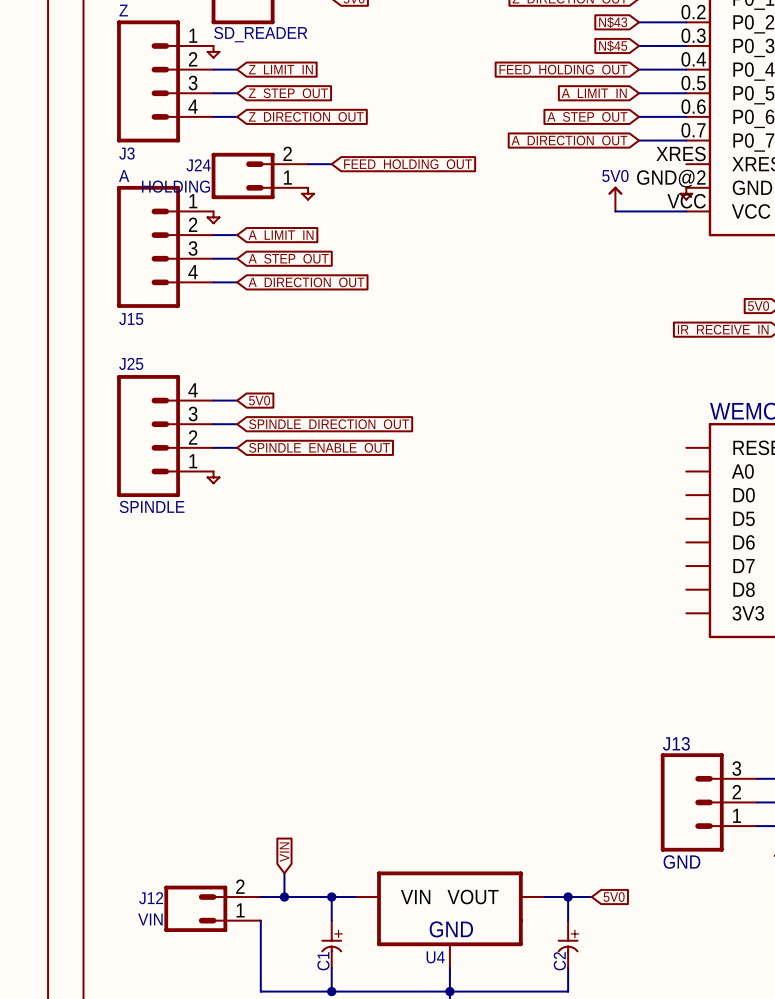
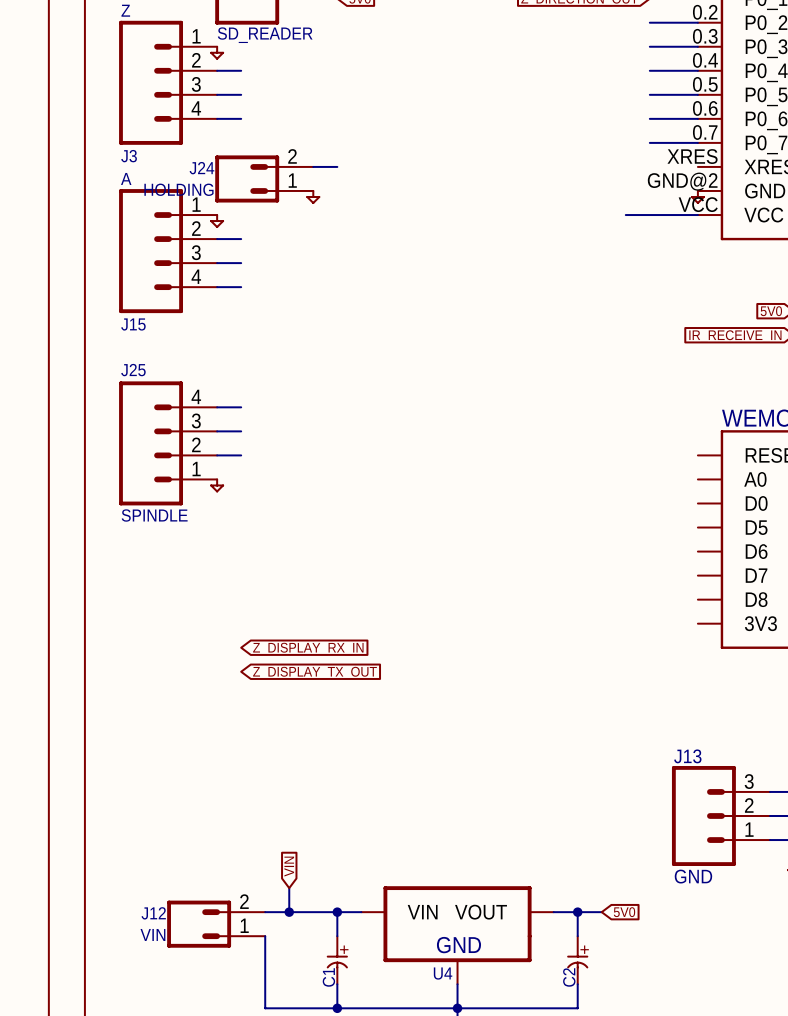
global label: N$43 (613, 22) -> none
global label: N$45 (613, 46) -> none
global label: Z_LIMIT_IN (280, 70) -> none
global label: FEED_HOLDING_OUT (563, 70) -> none
global label: Z_STEP_OUT (288, 94) -> none
global label: A_LIMIT_IN (594, 94) -> none
global label: Z_DIRECTION_OUT (306, 118) -> none
global label: A_STEP_OUT (587, 118) -> none
global label: A_DIRECTION_OUT (569, 141) -> none
global label: FEED_HOLDING_OUT (408, 165) -> none
power symbol: 5V0 (615, 199) -> none
global label: A_LIMIT_IN (281, 236) -> none
global label: A_STEP_OUT (288, 260) -> none
global label: A_DIRECTION_OUT (306, 283) -> none
global label: 5V0 (259, 400) -> none
global label: SPINDLE_DIRECTION_OUT (329, 425) -> none
global label: SPINDLE_ENABLE_OUT (319, 449) -> none
global label: none -> Z_DISPLAY_RX_IN (308, 649)
global label: none -> Z_DISPLAY_TX_OUT (314, 673)

